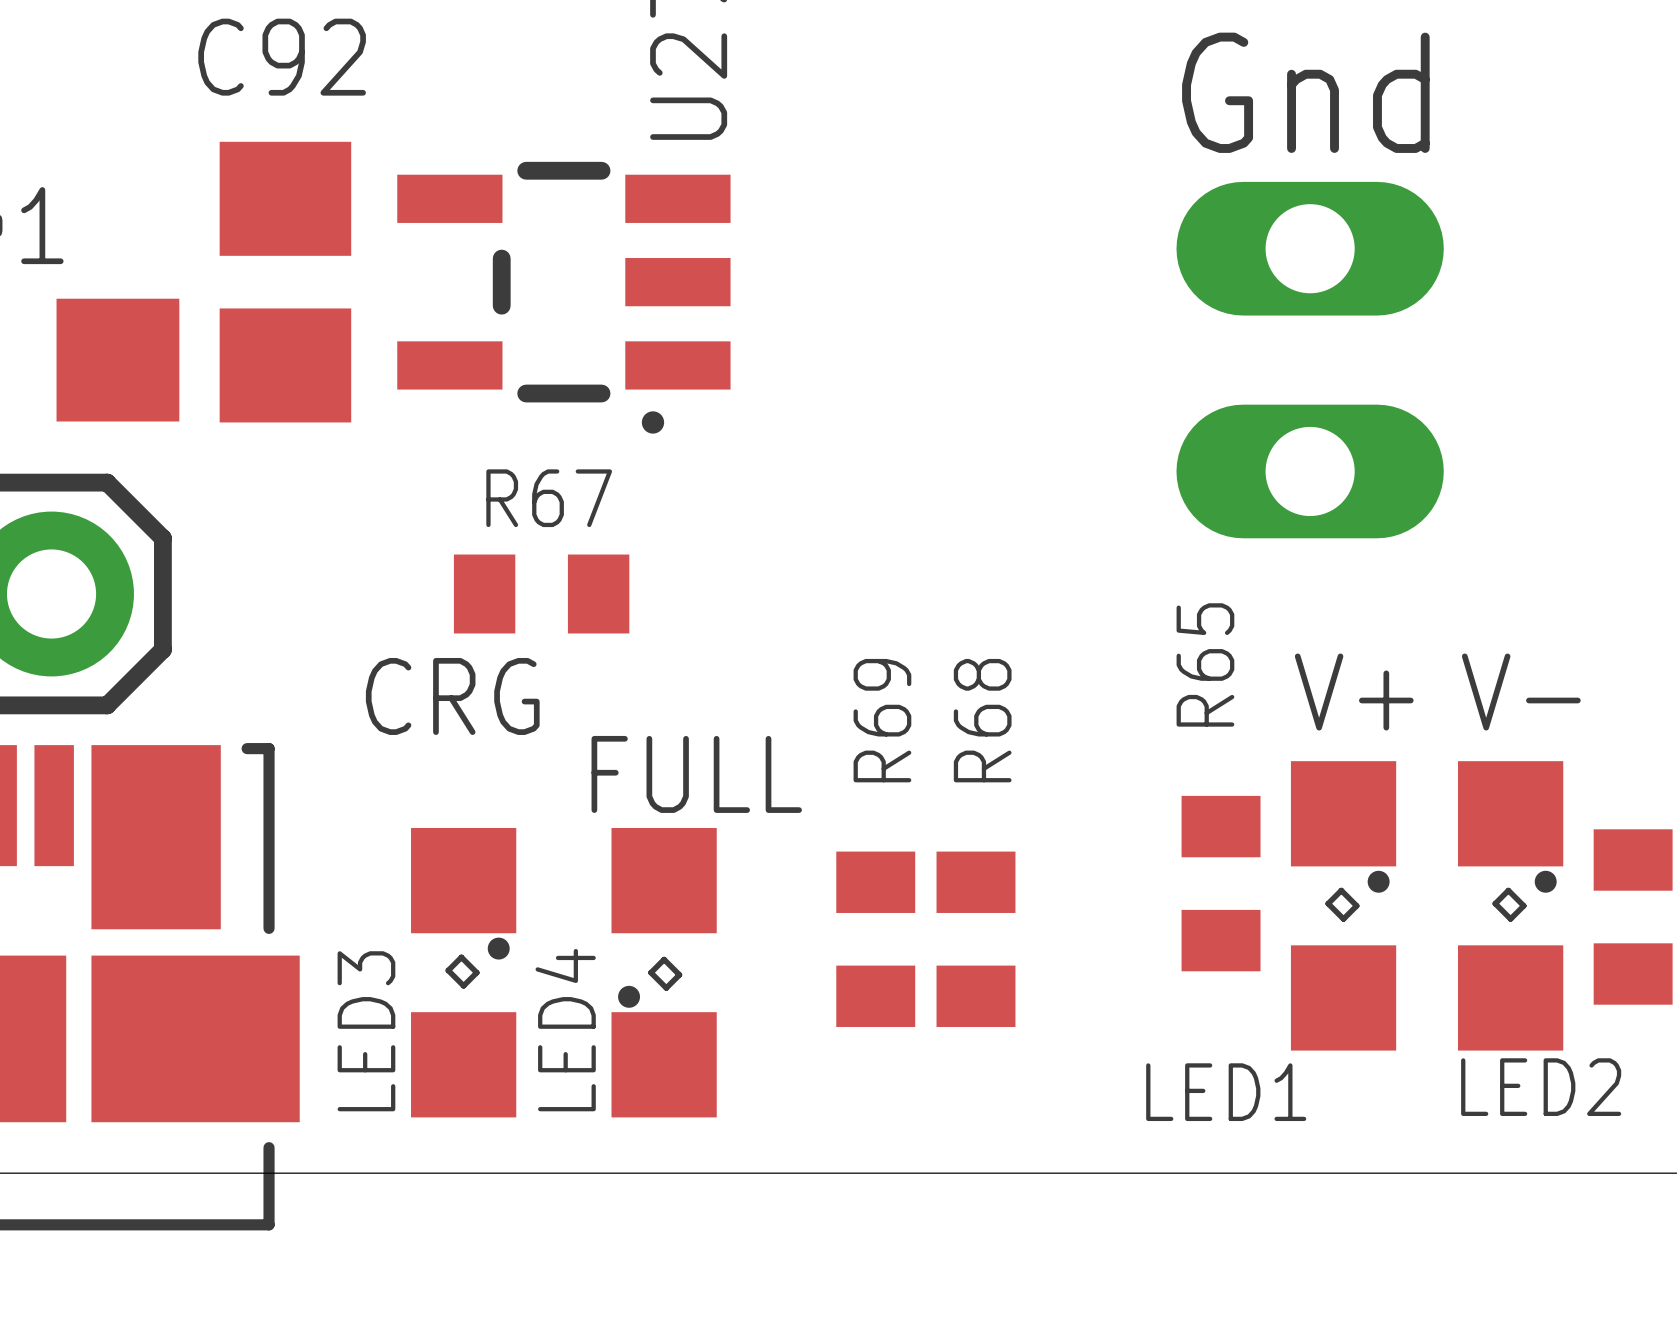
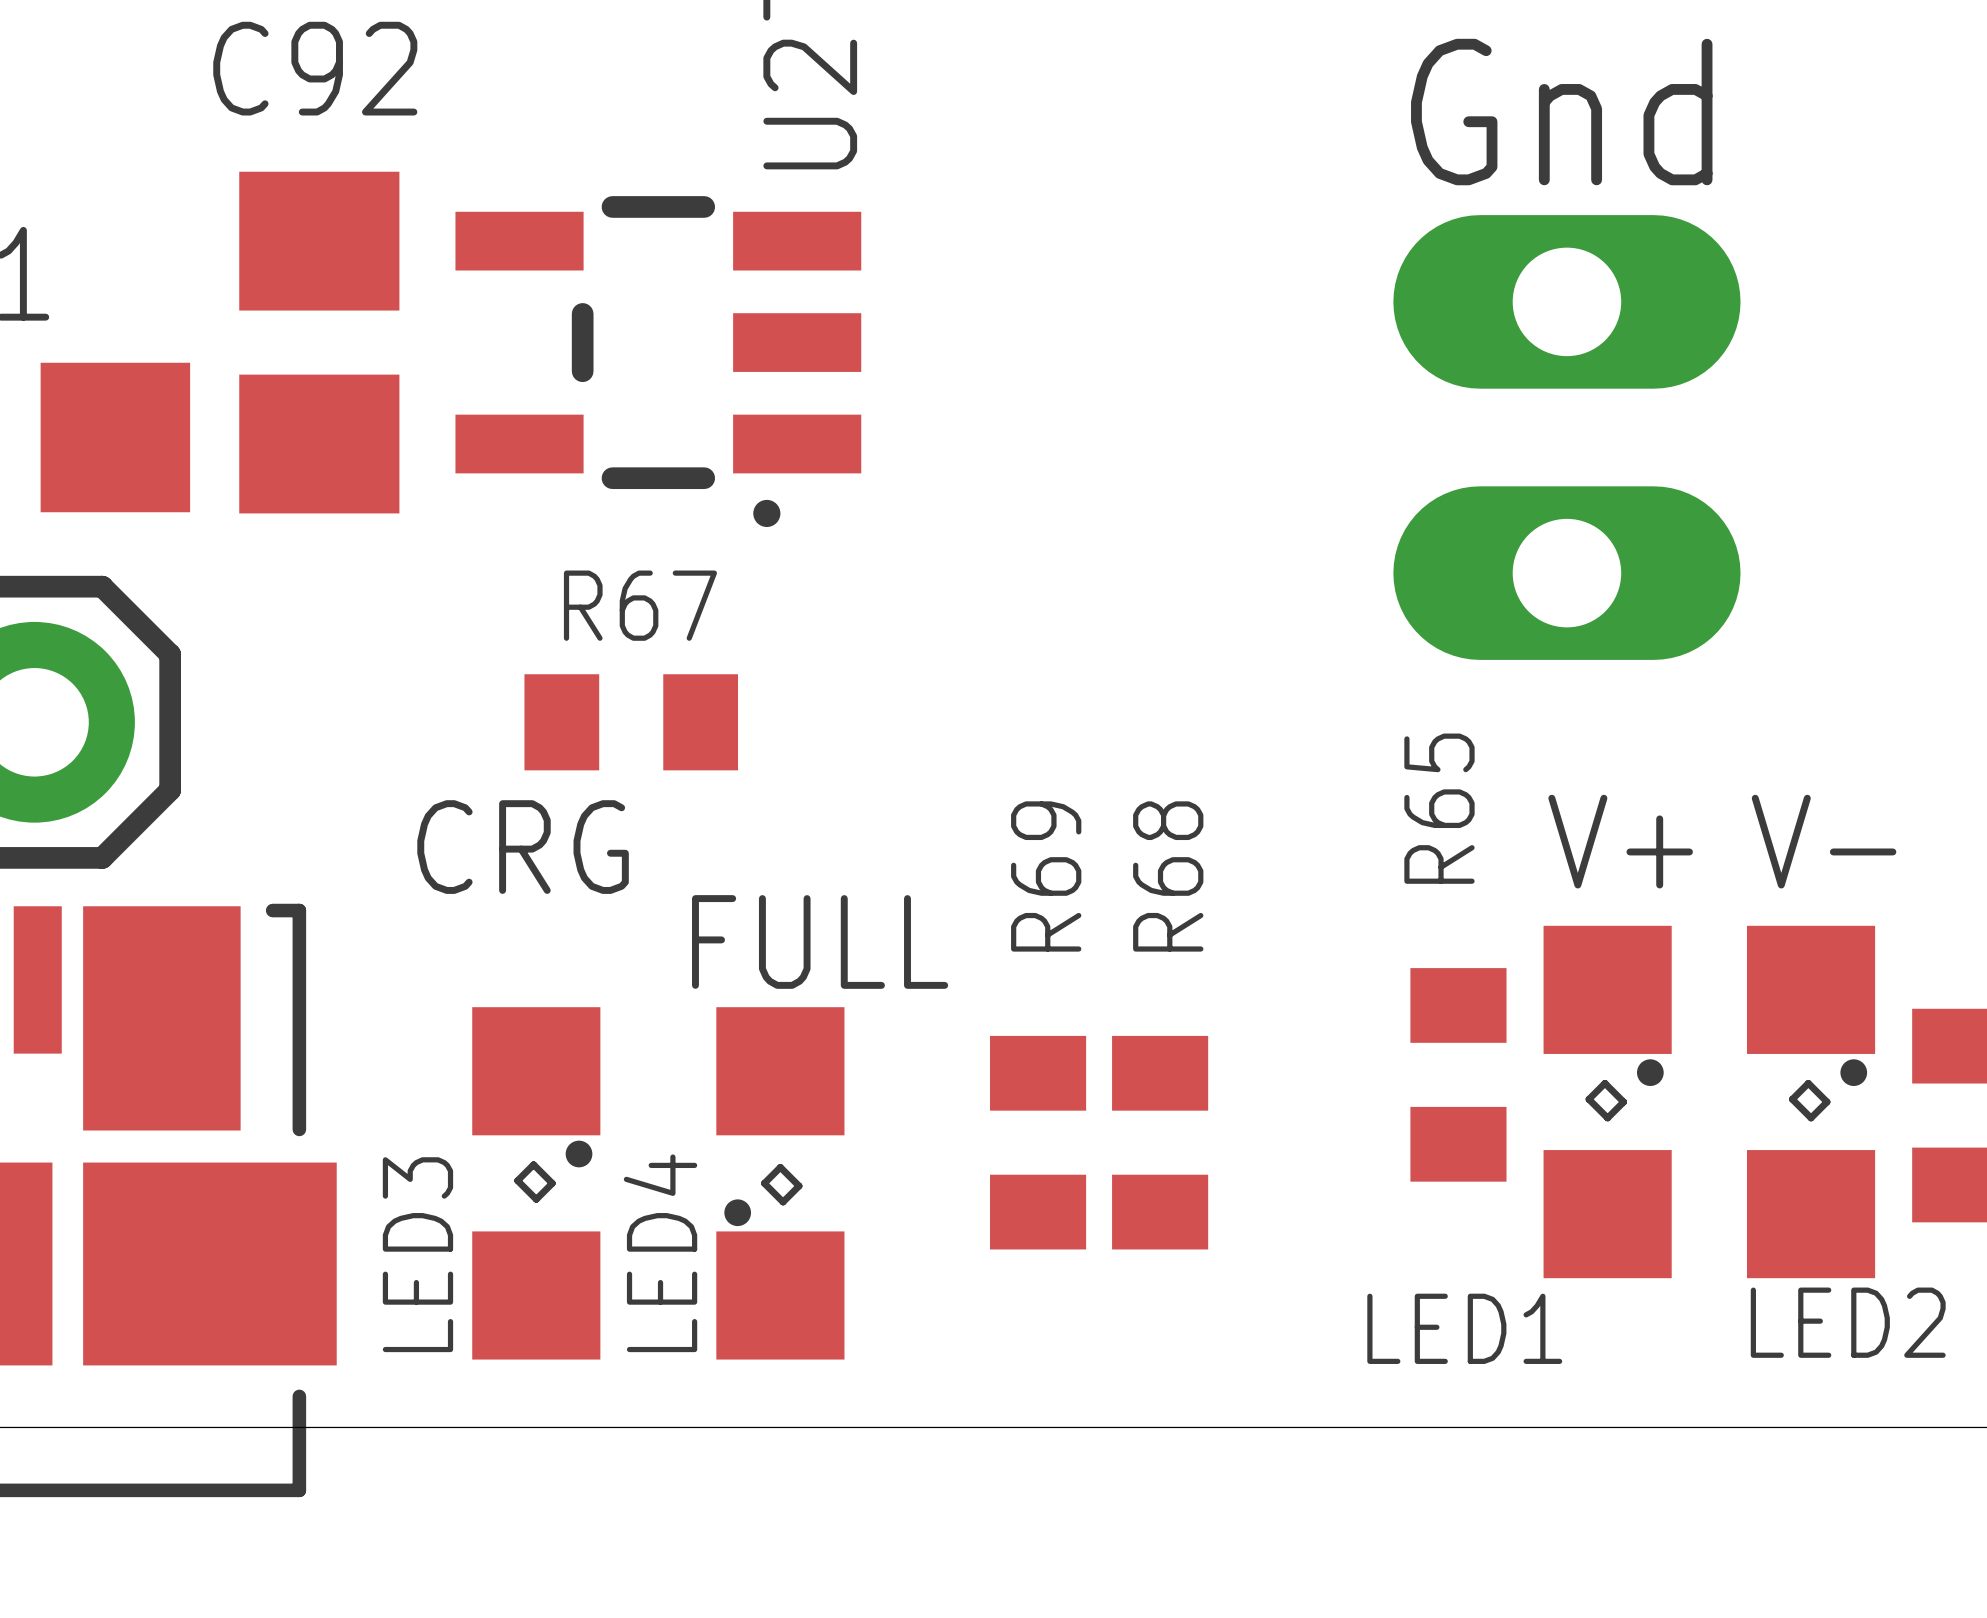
part footprint: [1176, 181, 1444, 539] -> [1393, 215, 1741, 660]

